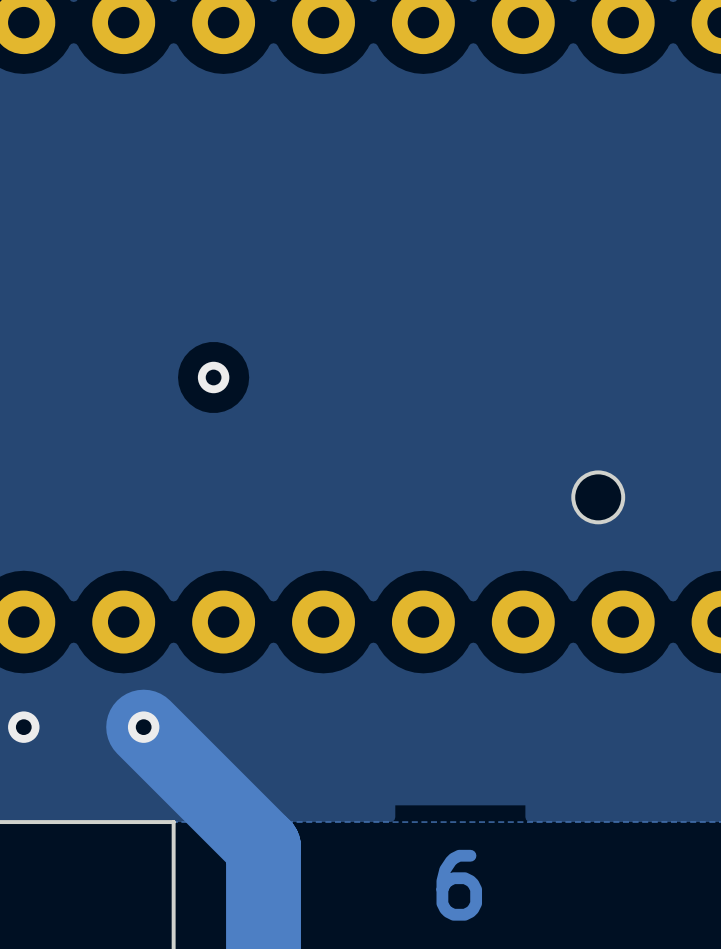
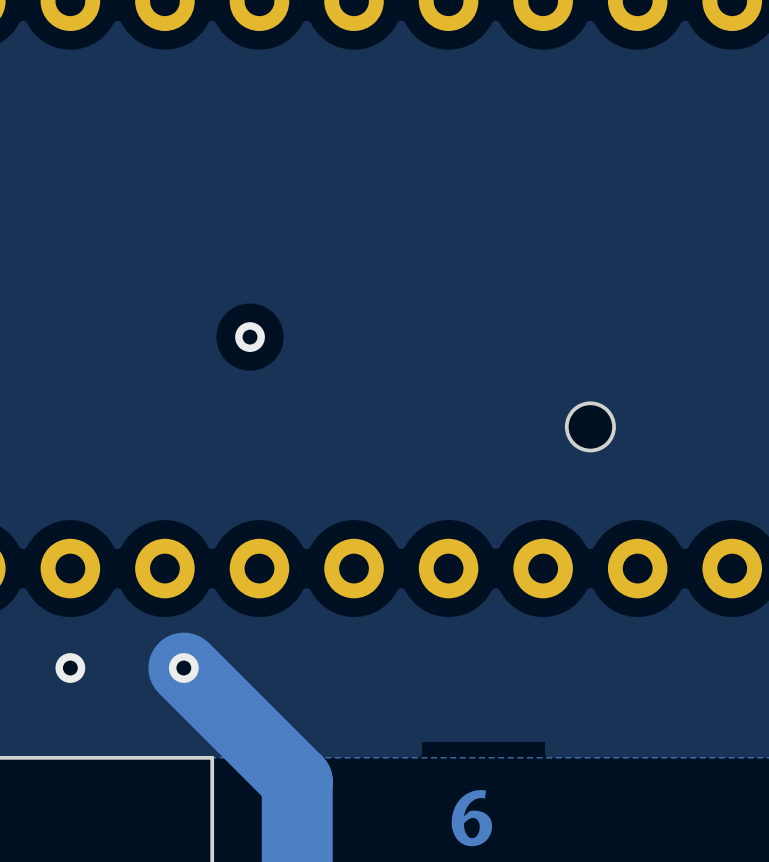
round board edge position: (598, 497) -> (590, 426)

